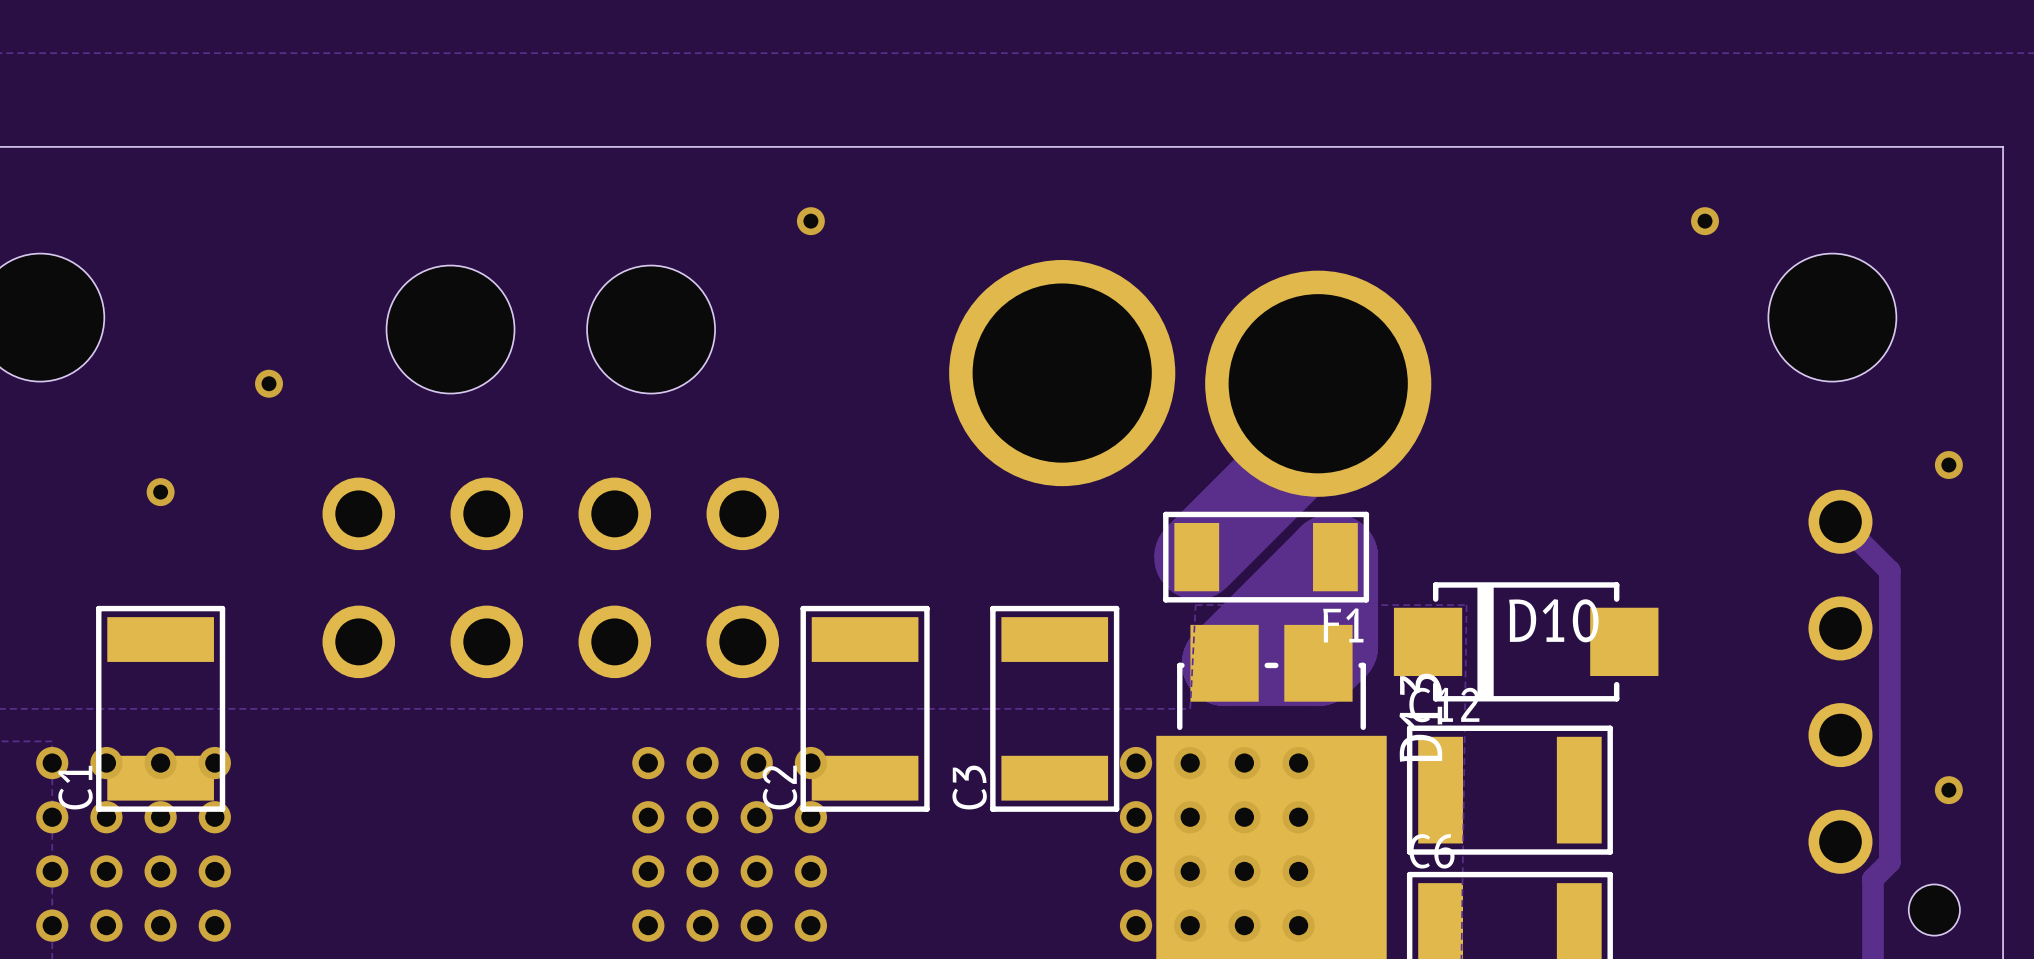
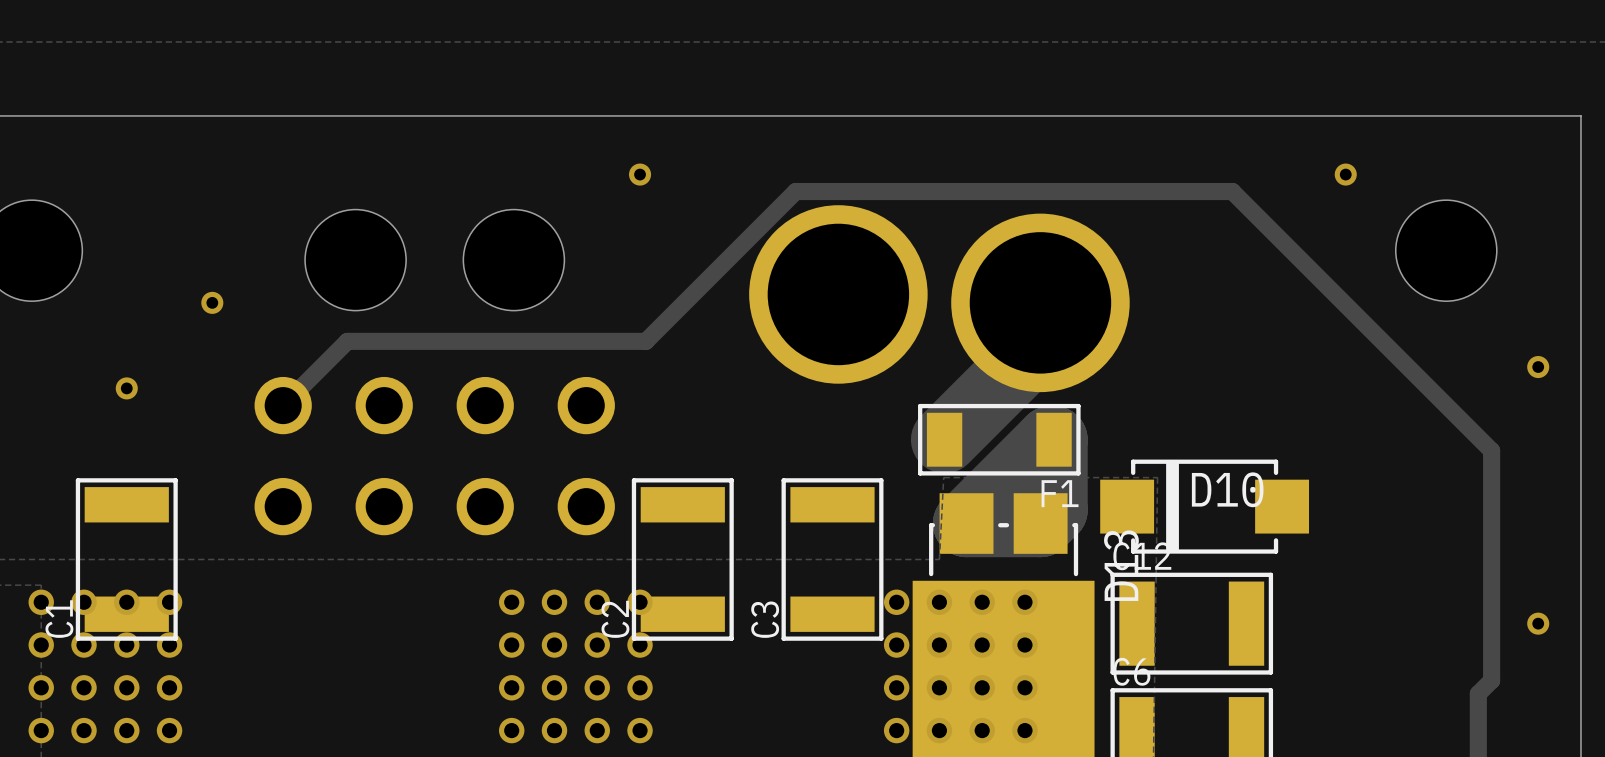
track: none -> (283, 405) (347, 341) (645, 341) (795, 191) (1232, 191) (1452, 411)
part: (1884, 712) -> none

